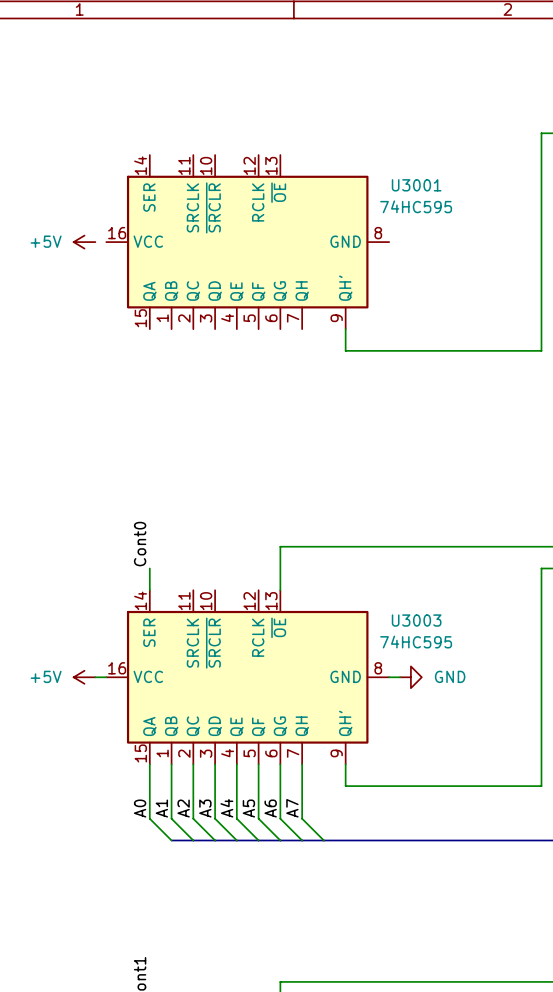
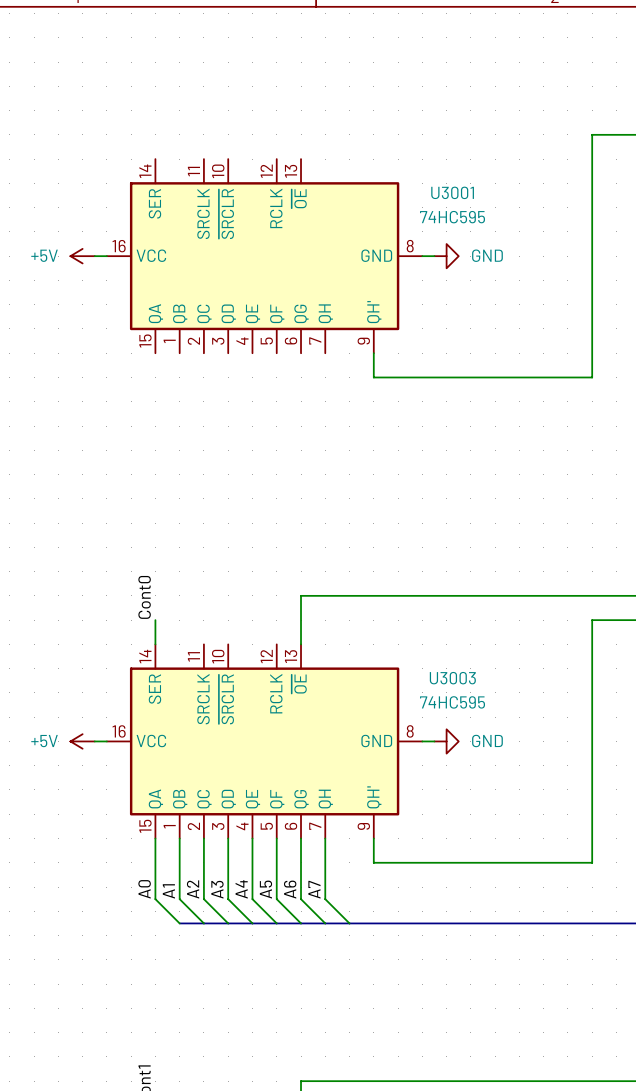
wire: none -> (94, 256) (106, 256)
wire: none -> (422, 256) (434, 256)
power symbol: none -> GND (446, 256)

